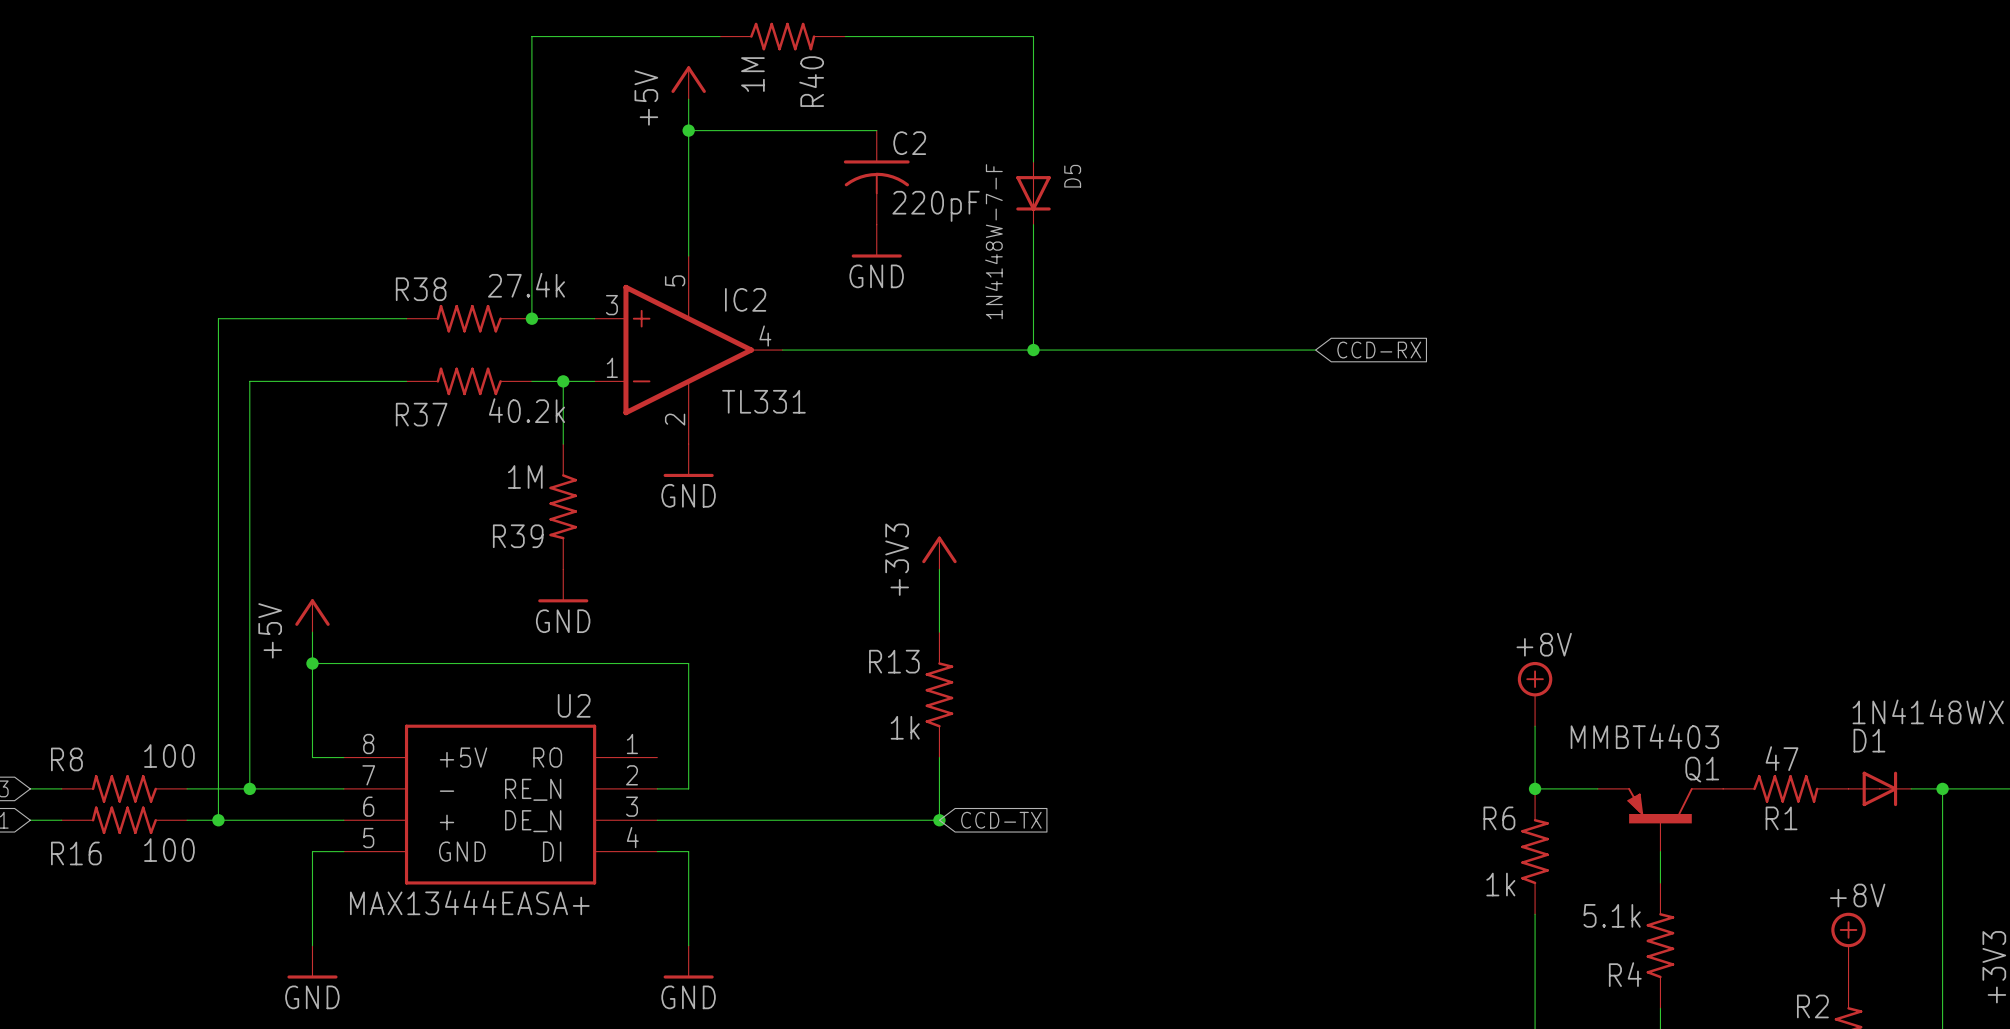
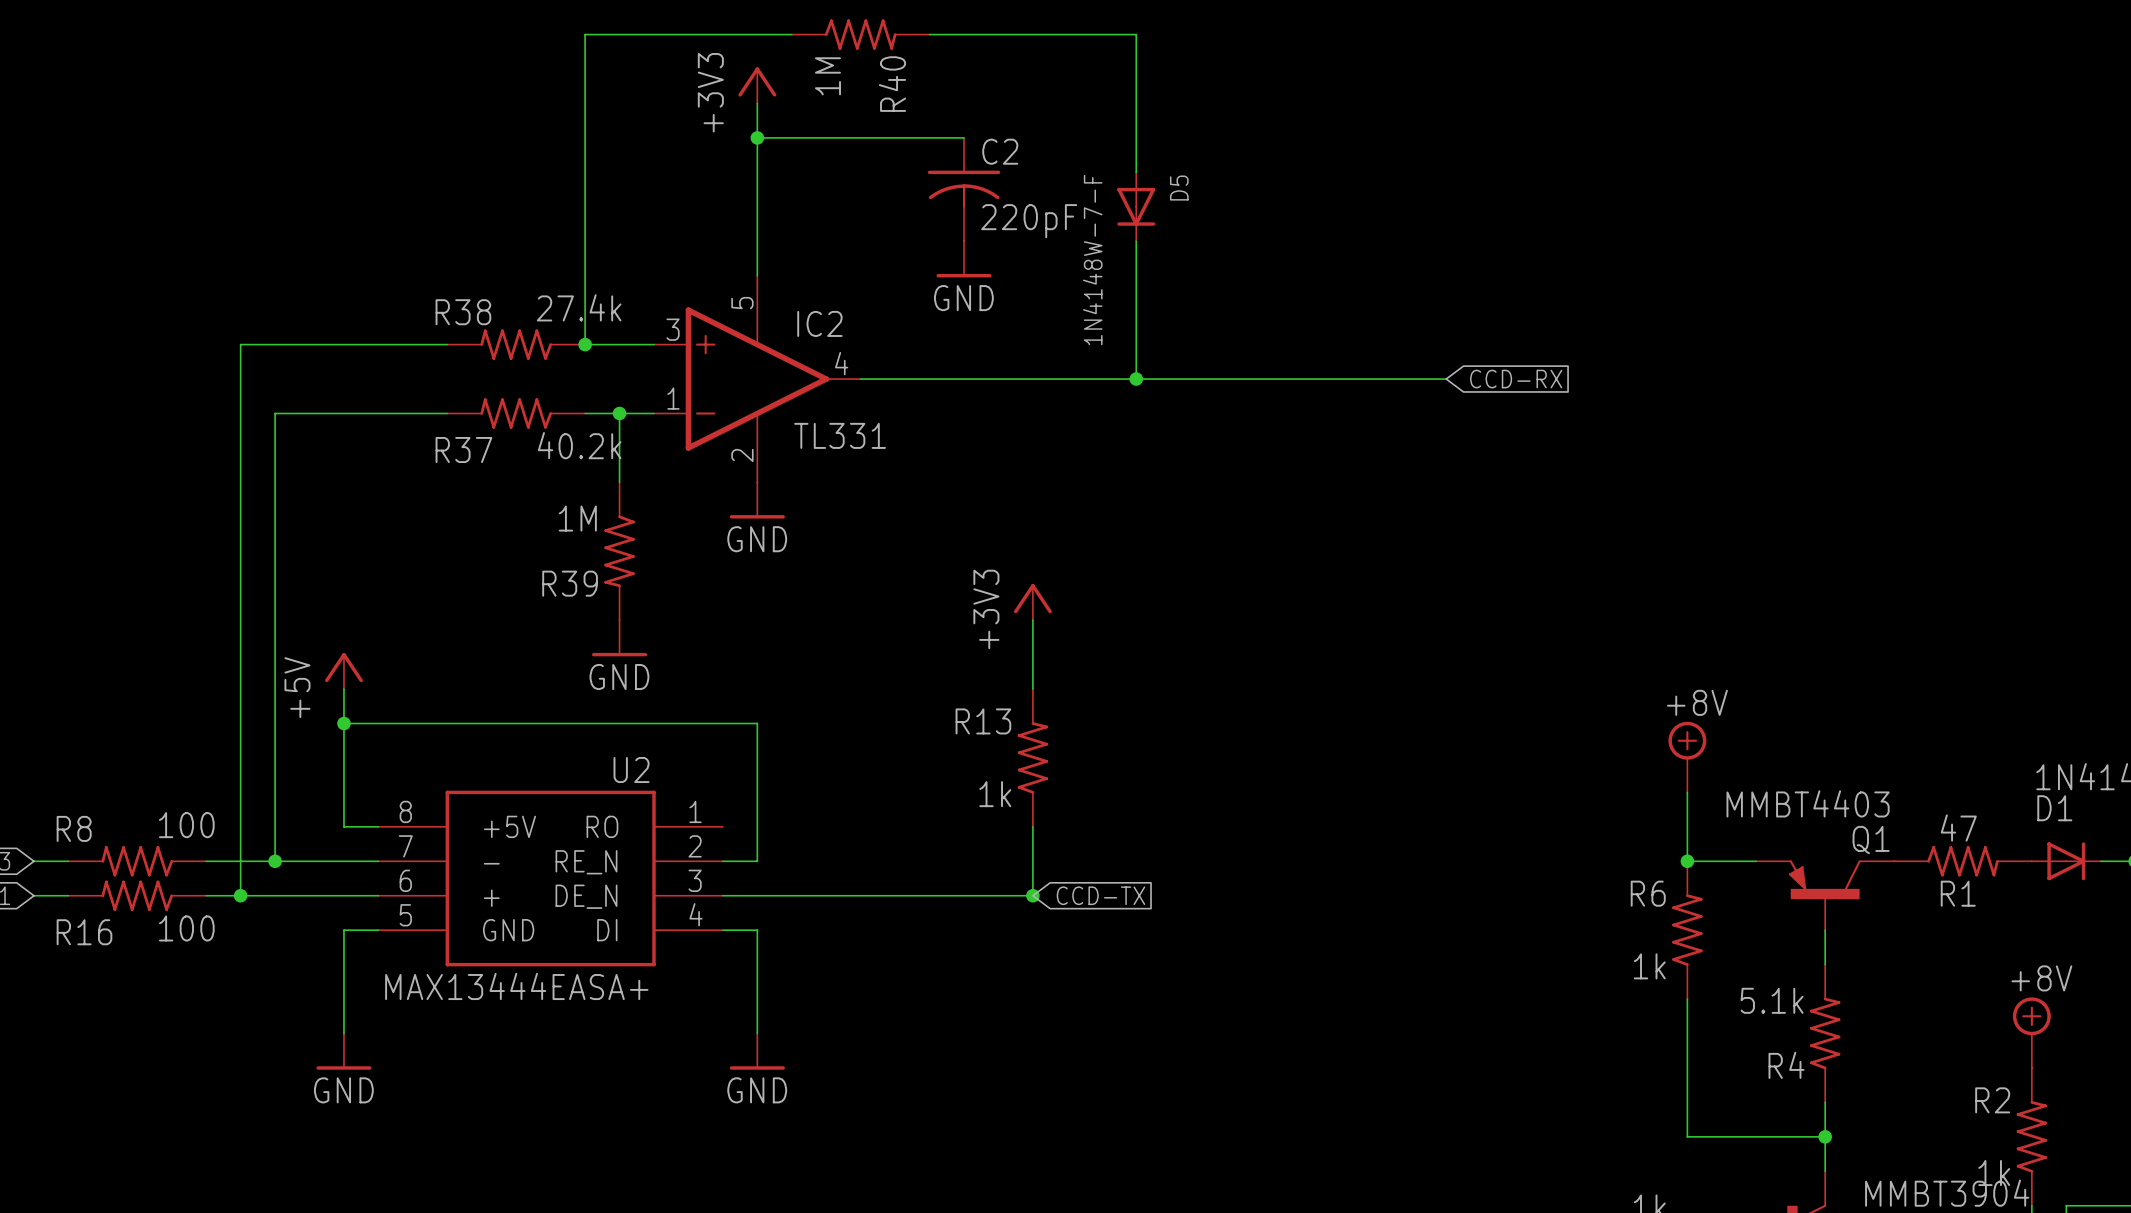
power symbol: +5V (688, 82) -> +3V3 (757, 85)

